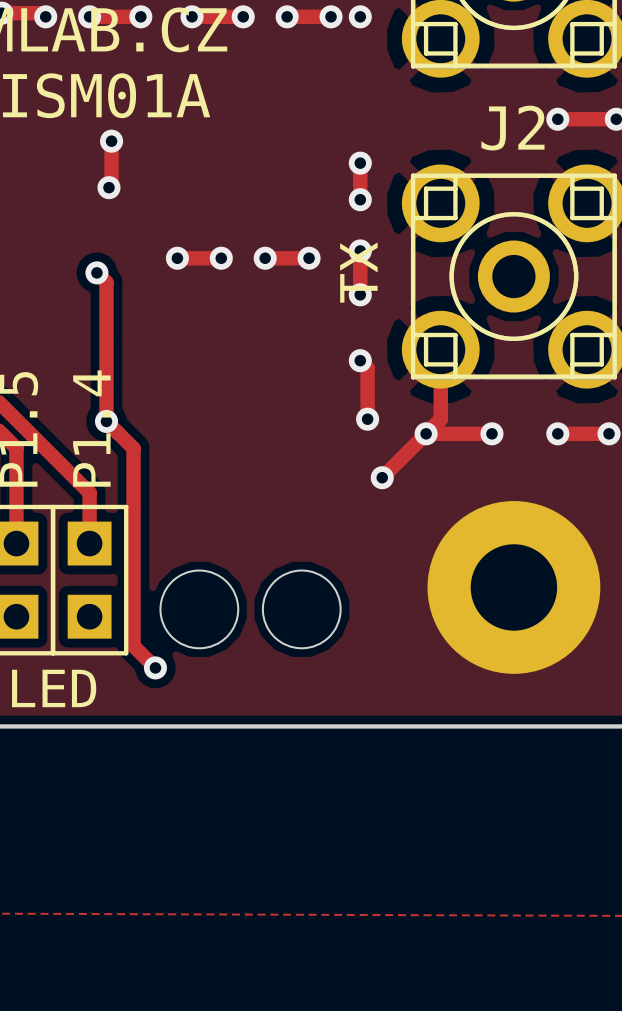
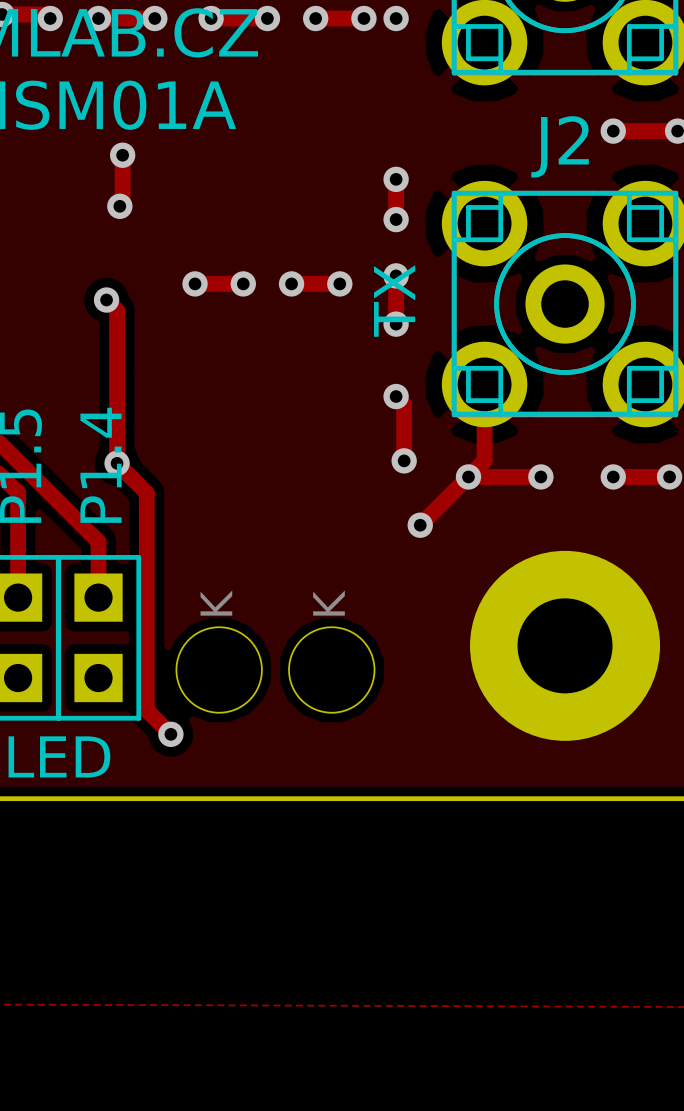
part text: none -> K (216, 603)
part text: none -> K (328, 603)

